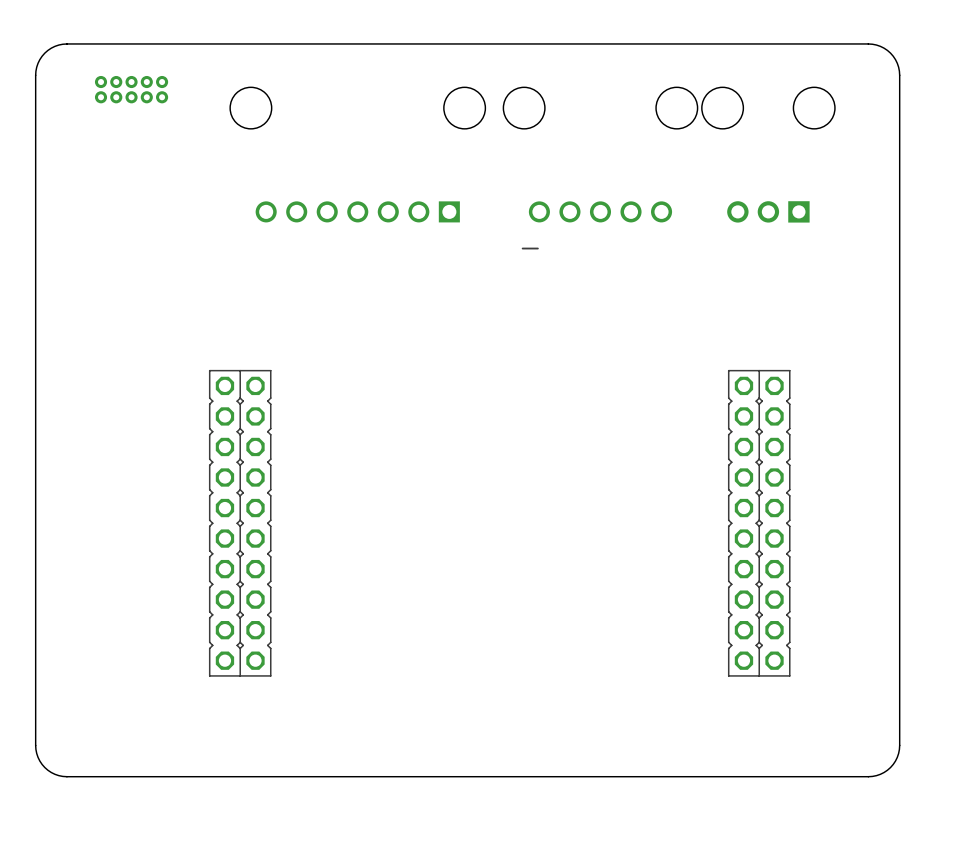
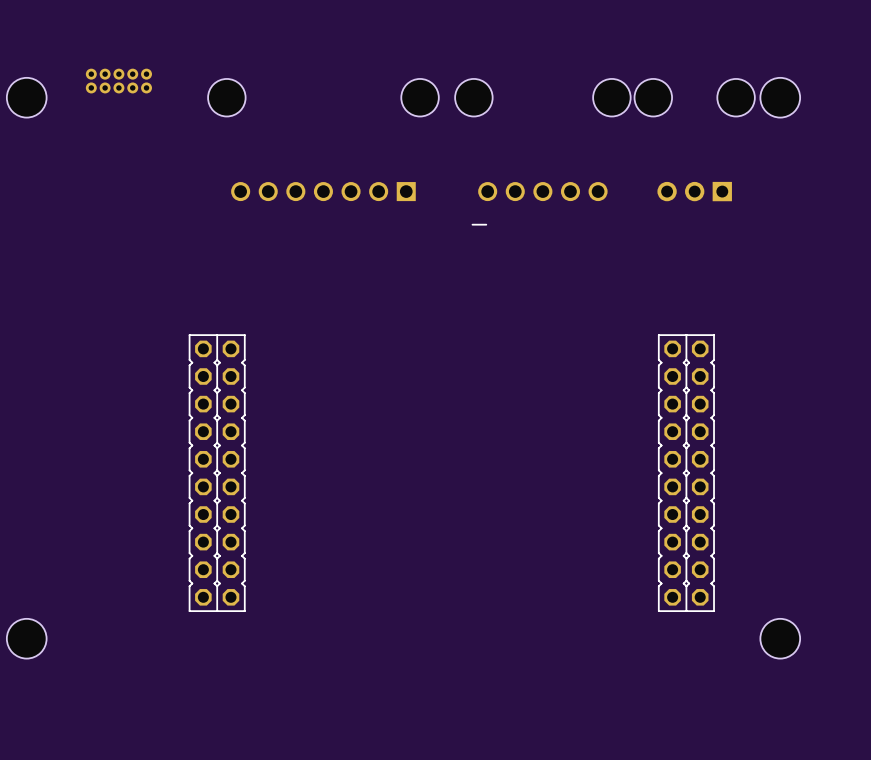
board edge: (868, 43) (66, 43) (54, 46) (47, 50) (38, 63) (35, 75) (35, 745) (38, 757) (42, 764) (54, 774) (66, 776) (868, 776) (880, 774) (887, 770) (897, 757) (899, 745) (899, 75) (897, 63) (890, 53) (880, 46) (868, 43) -> none
hole: none -> (26, 97)
hole: none -> (780, 97)
hole: none -> (26, 638)
hole: none -> (780, 638)

